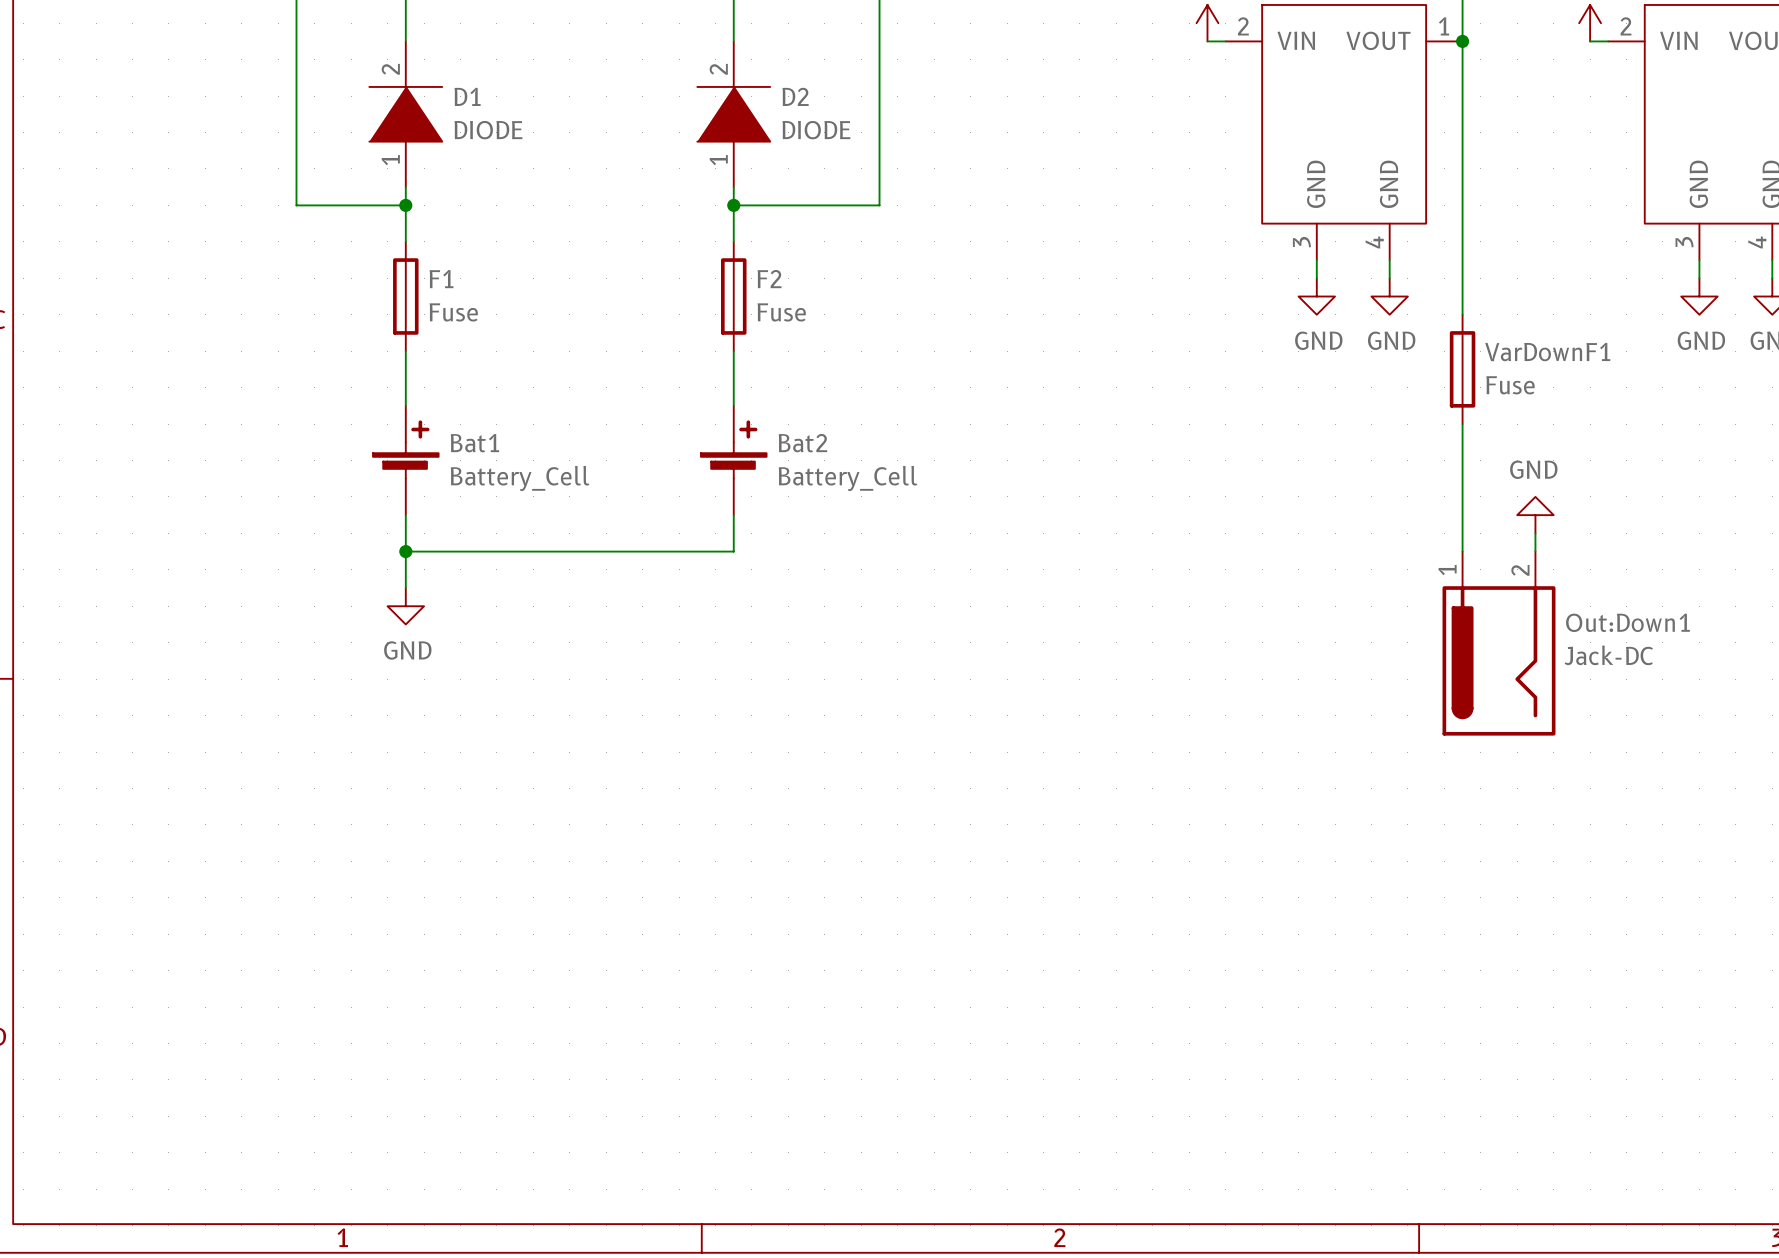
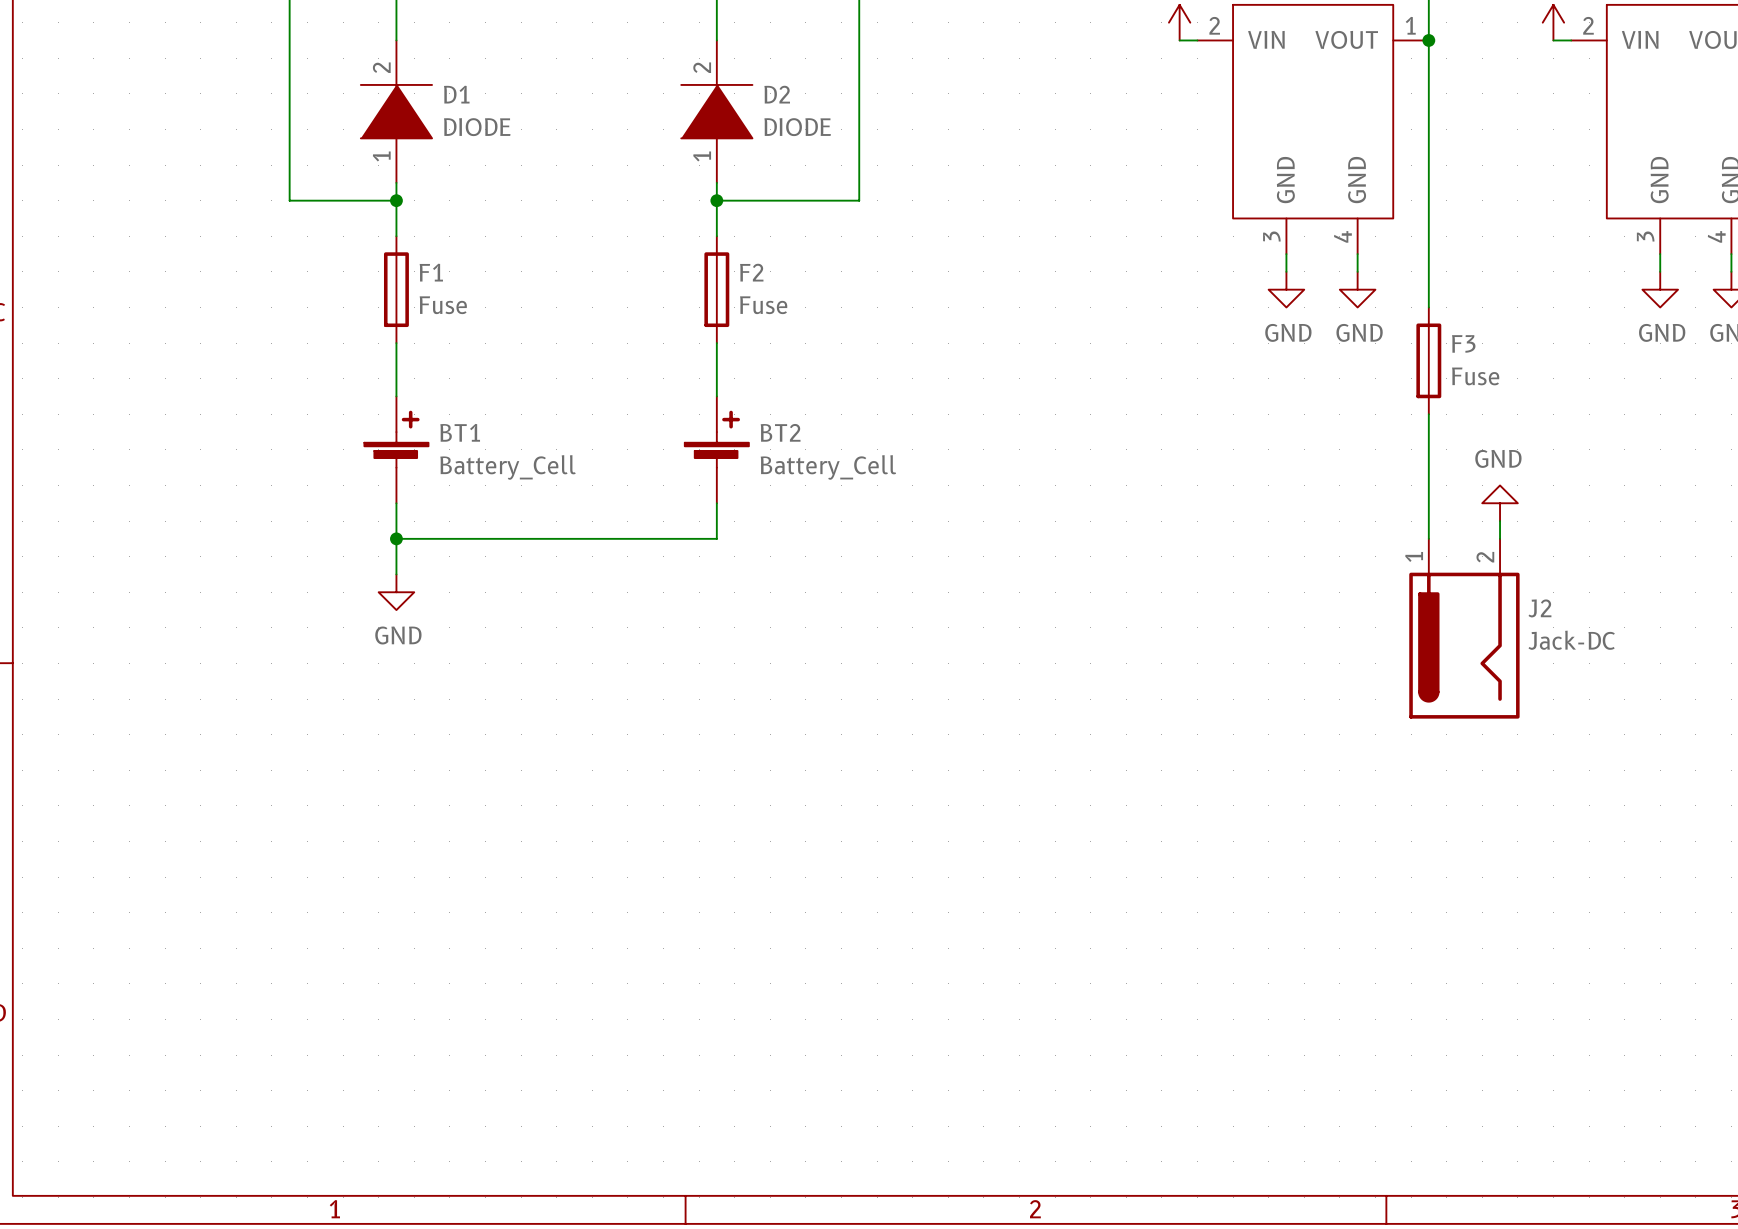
VarDownF1 name: VarDownF1 (1547, 352) -> F3 (1463, 343)
Bat1 name: Bat1 (474, 443) -> BT1 (460, 432)
Bat2 name: Bat2 (802, 443) -> BT2 (780, 432)
J2 name: Out:Down1 (1627, 622) -> J2 (1539, 608)

